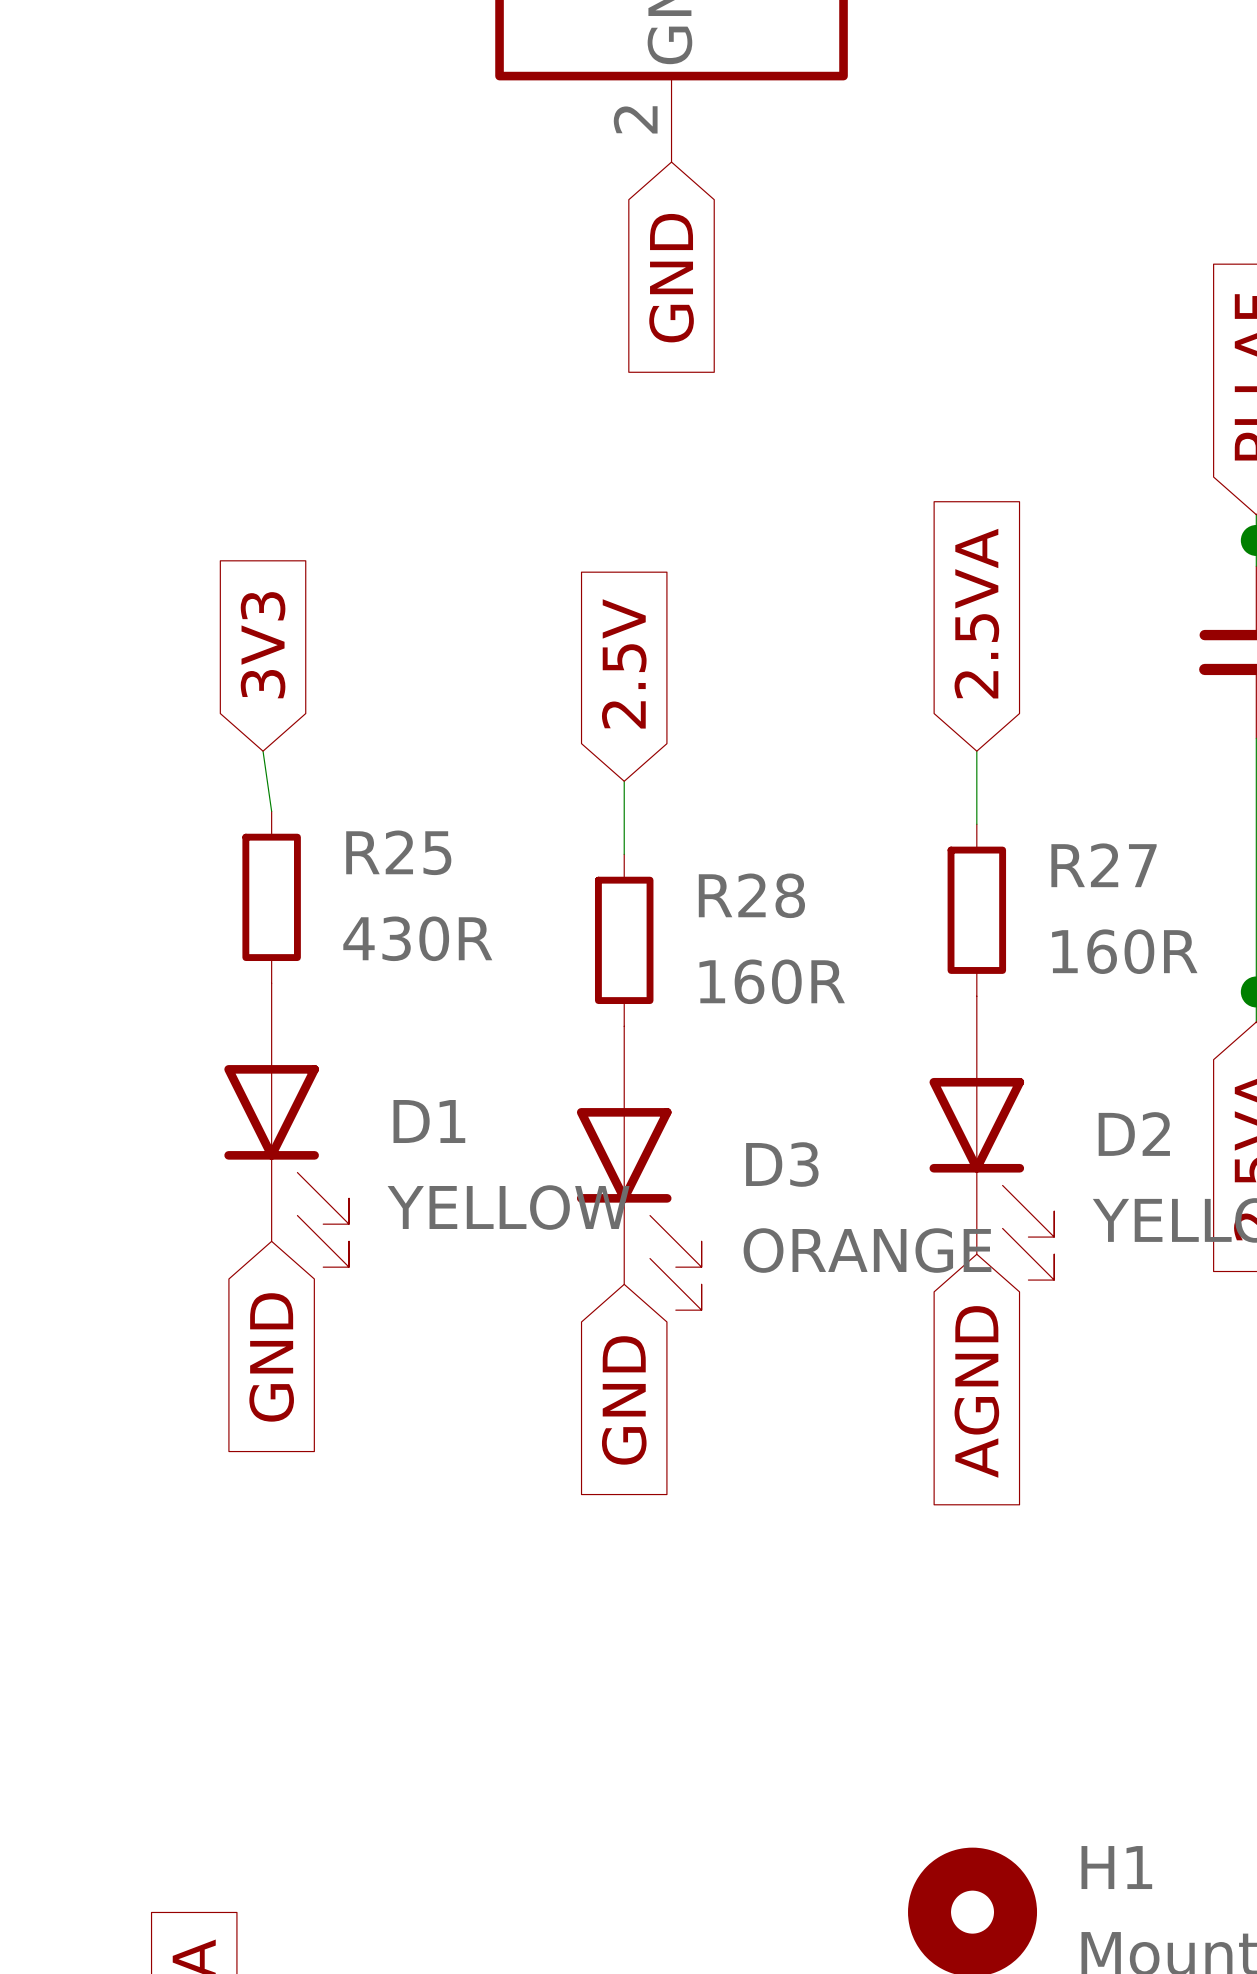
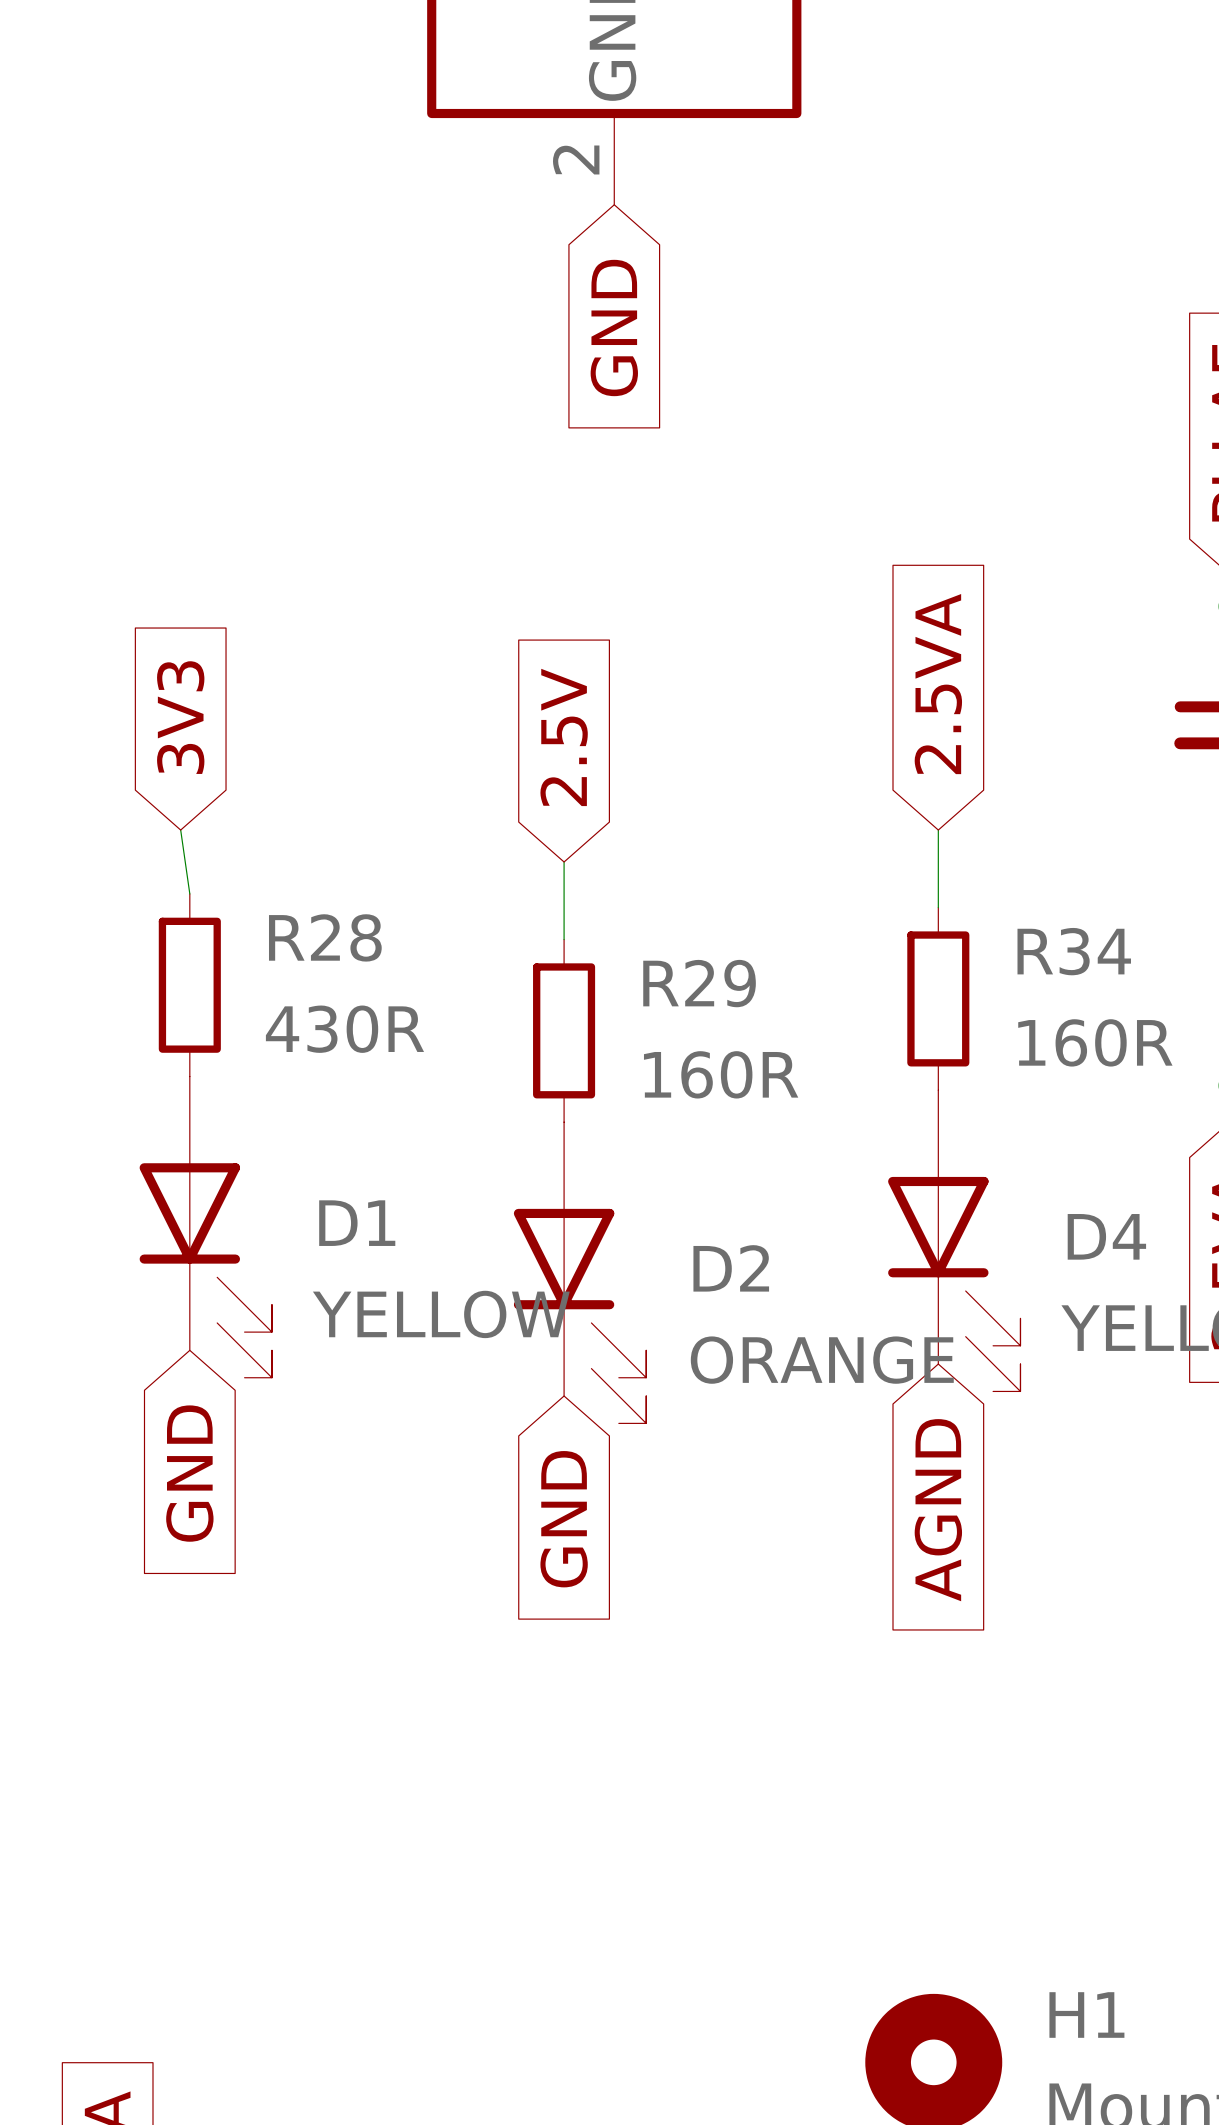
R25 name: R25 (398, 852) -> R28 (325, 937)
R27 name: R27 (1104, 865) -> R34 (1074, 951)
R28 name: R28 (751, 895) -> R29 (699, 983)
D2 name: D2 (1134, 1134) -> D4 (1106, 1236)
D3 name: D3 (782, 1164) -> D2 (731, 1268)

